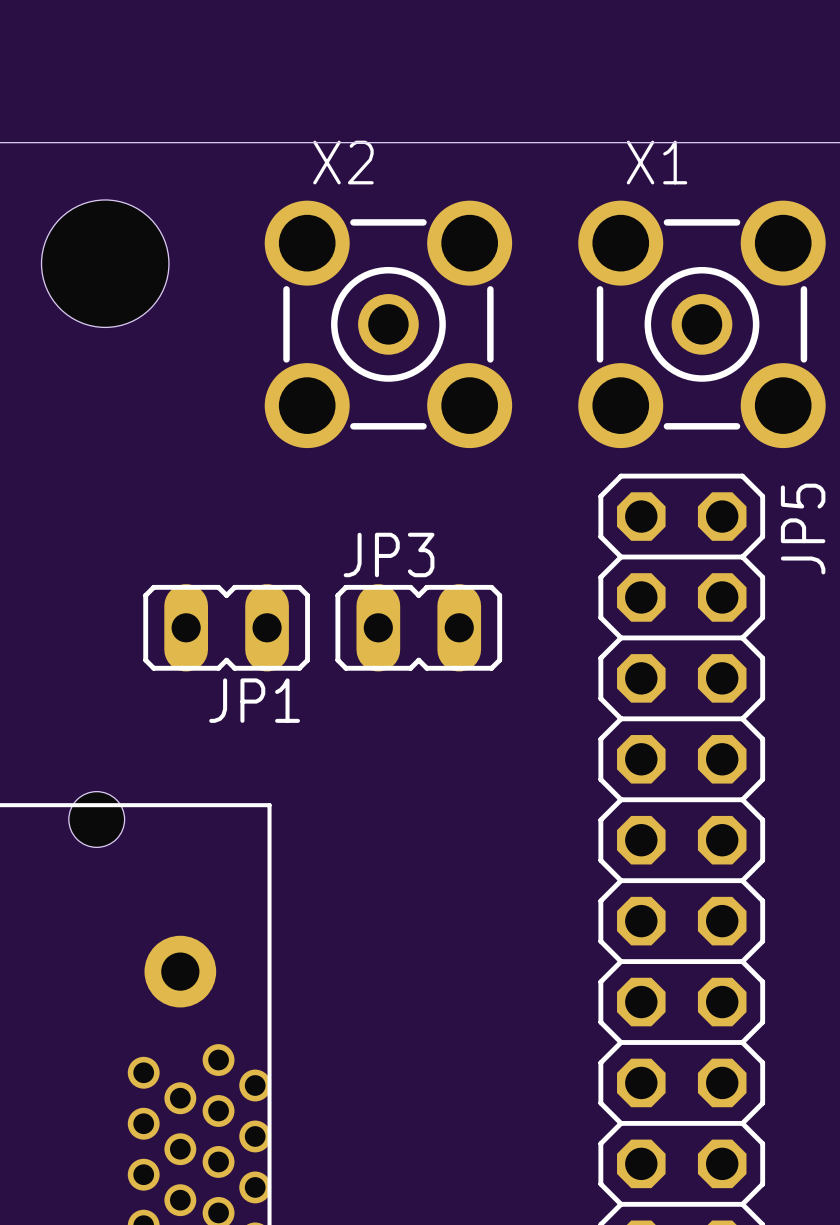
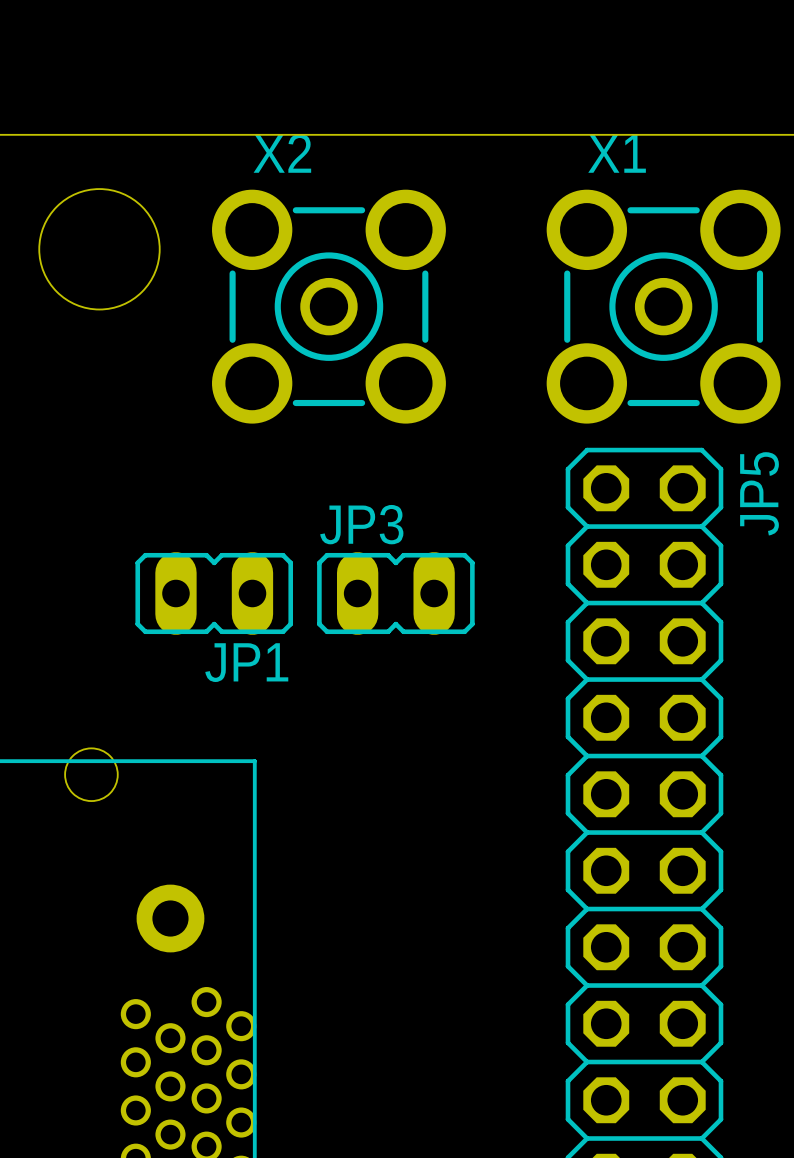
X2 position: (388, 324) -> (328, 306)

